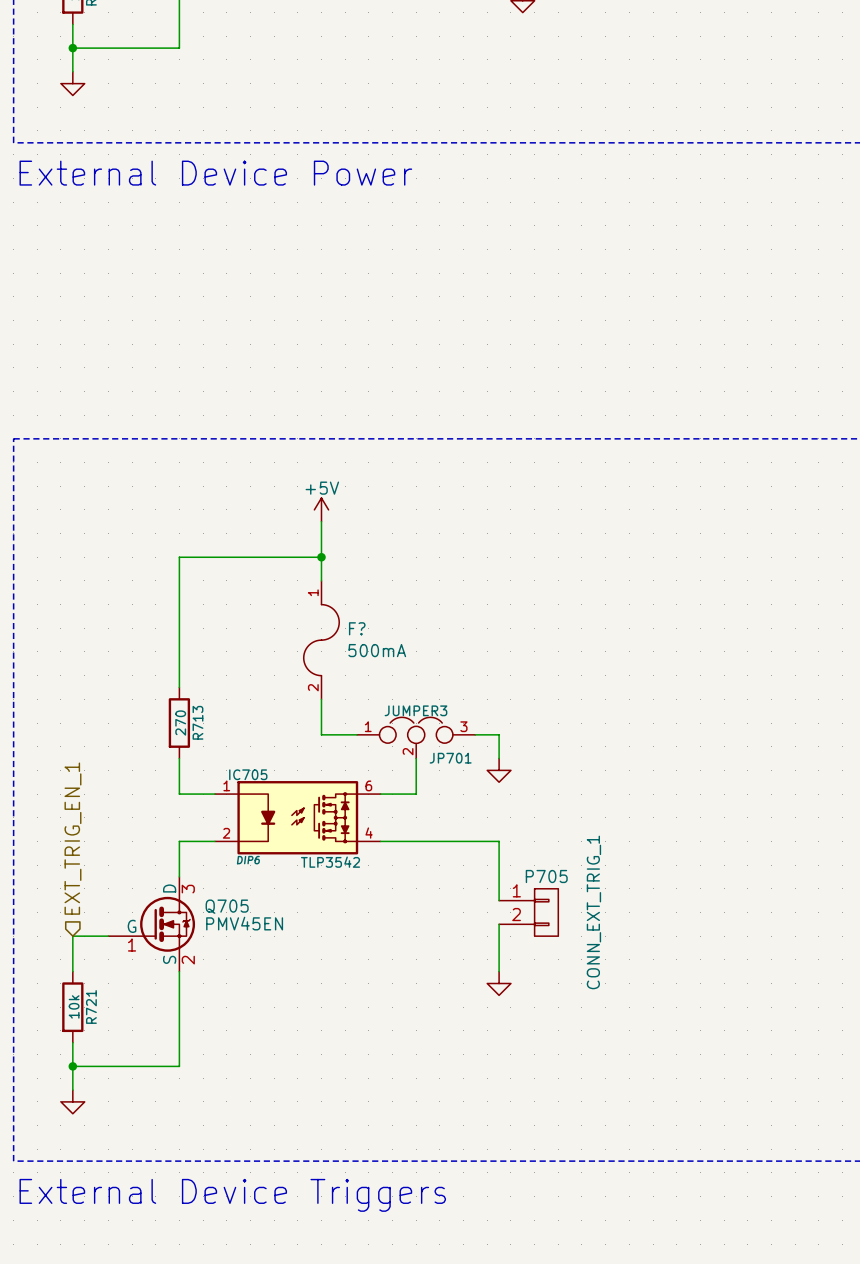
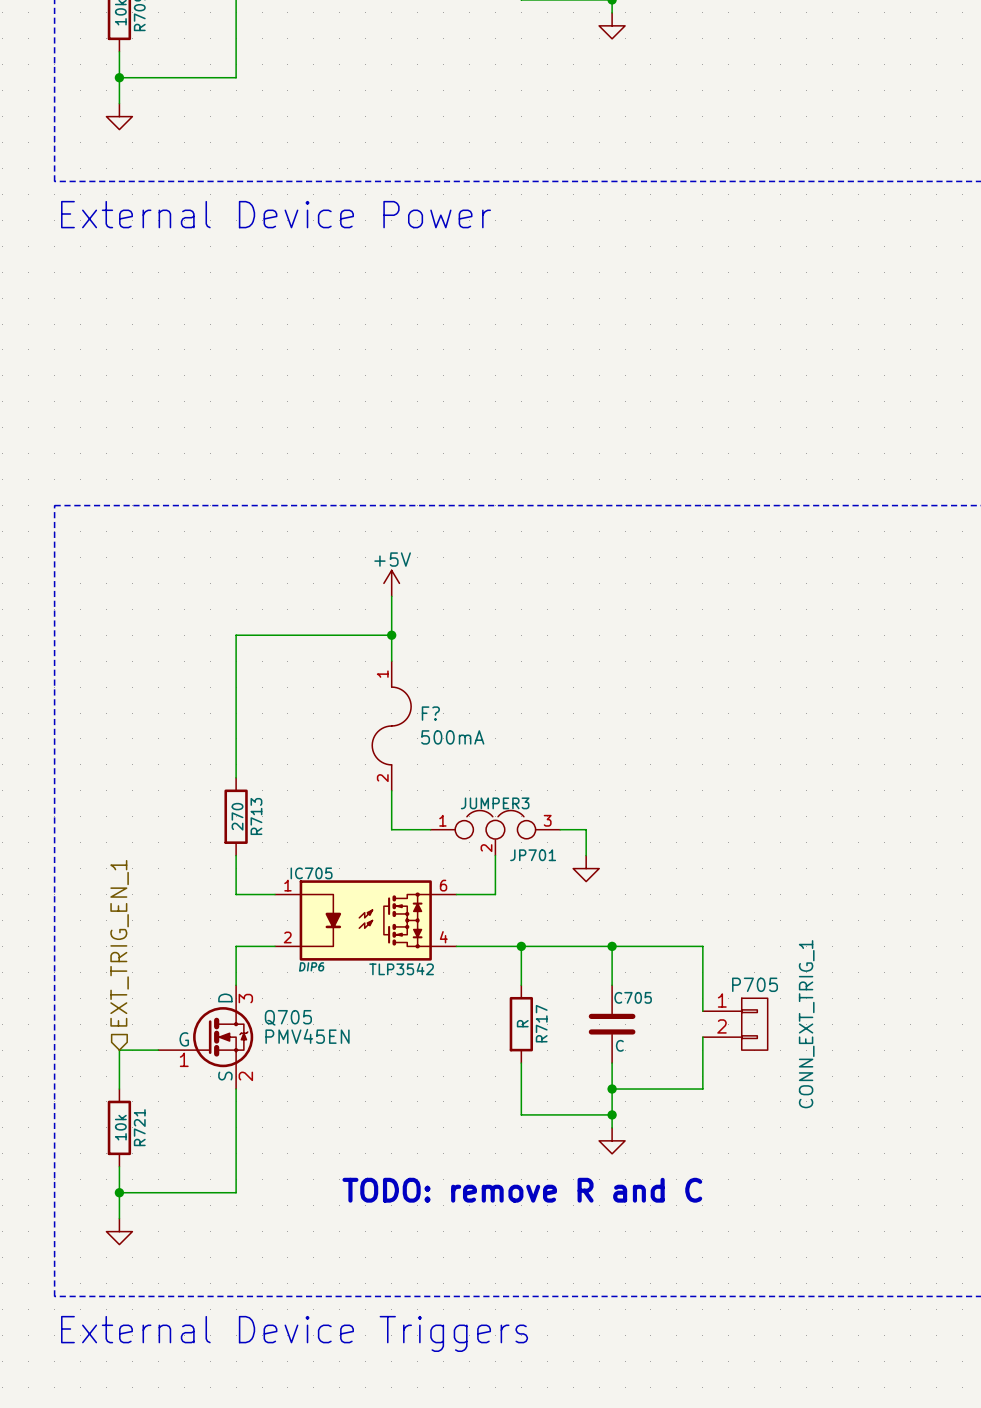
wire: none -> (521, 946) (521, 985)
junction: none -> (521, 946)
wire: (499, 841) (499, 900) -> (586, 946) (702, 946) (702, 1011)
wire: none -> (612, 946) (612, 985)
junction: none -> (612, 946)
R717: none -> R (521, 1024)
C705: none -> C (612, 1024)
P705 position: (528, 912) -> (735, 1024)
wire: (499, 924) (499, 971) -> none
wire: none -> (702, 1037) (702, 1089) (612, 1089)
wire: none -> (521, 1063) (521, 1114) (612, 1114)
wire: none -> (612, 1063) (612, 1127)
junction: none -> (612, 1089)
power symbol position: (499, 983) -> (612, 1140)
junction: none -> (612, 1114)
text: none -> TODO: remove R and C (522, 1190)

